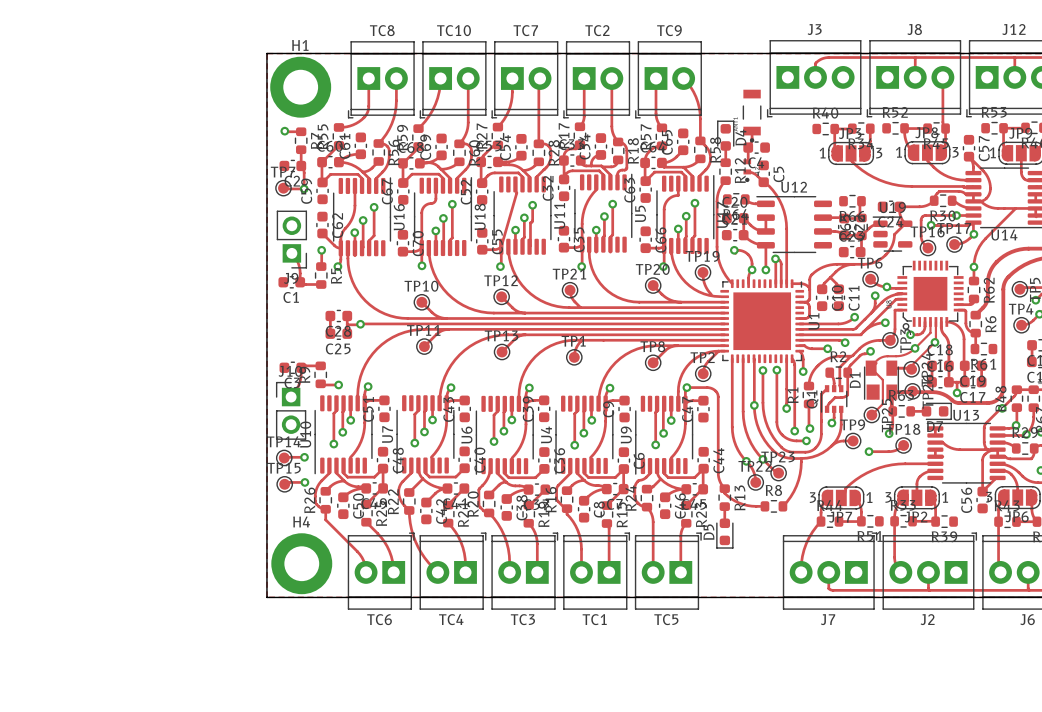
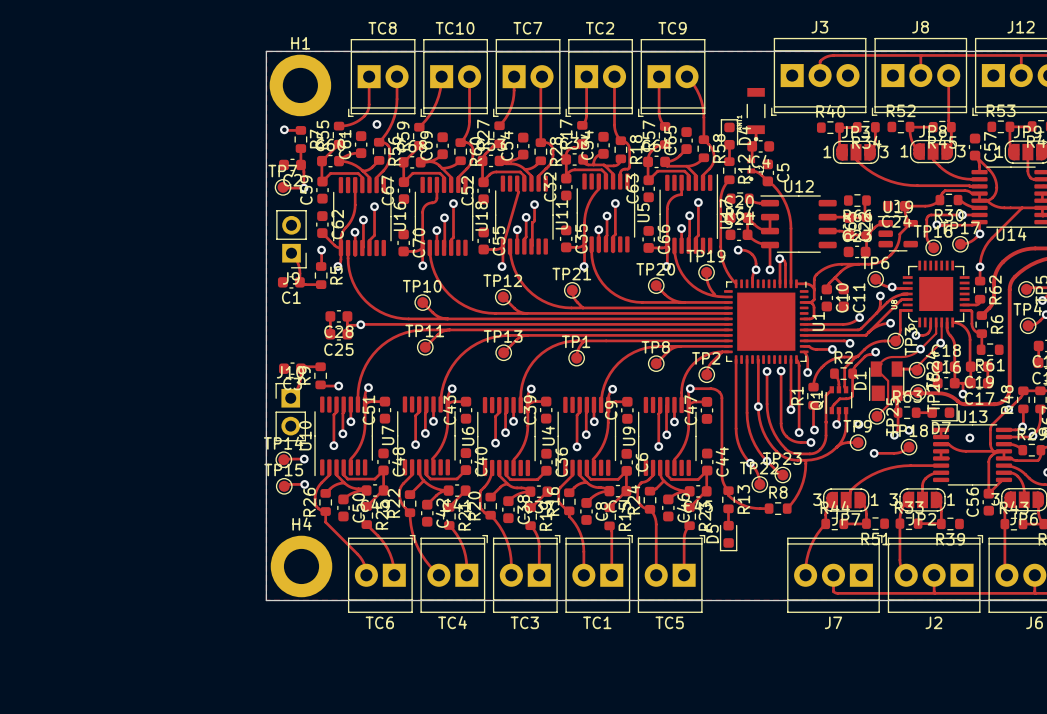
via: none -> (376, 124)
via: none -> (858, 424)
via: none -> (908, 430)
via: none -> (969, 437)

